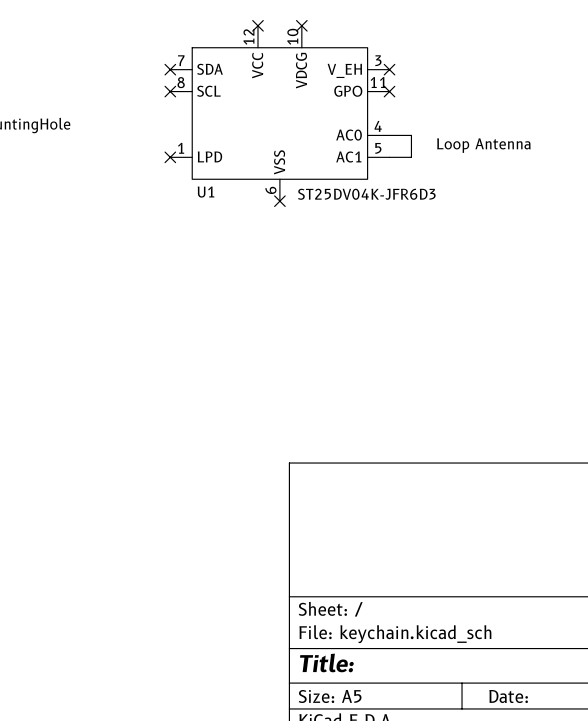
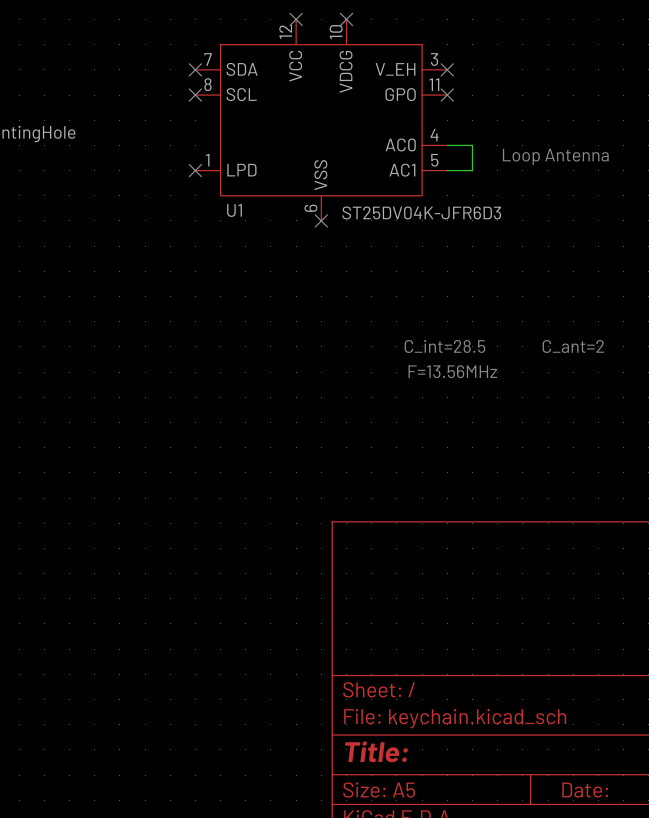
text: none -> C_int=28.5 (444, 346)
text: none -> C_ant=2 (573, 346)
text: none -> F=13.56MHz (452, 371)

